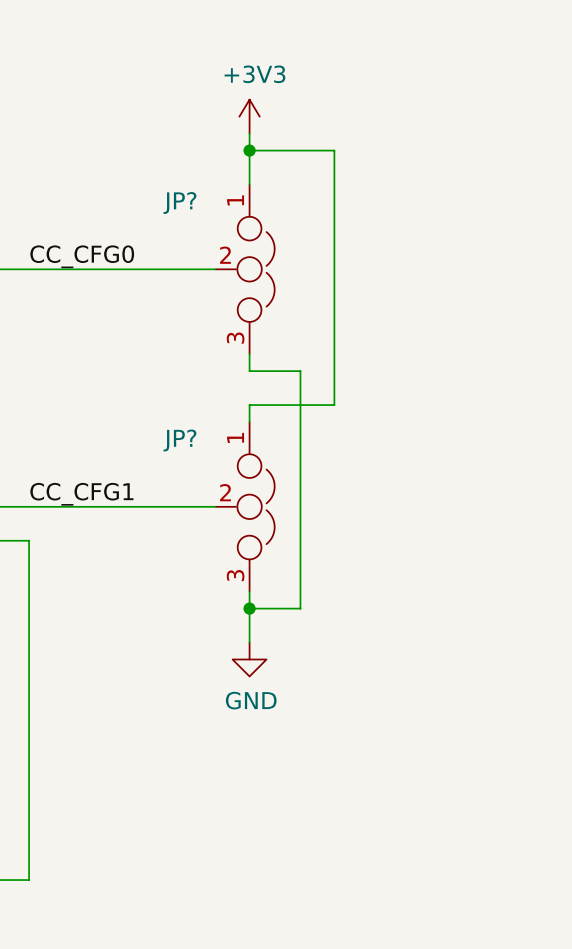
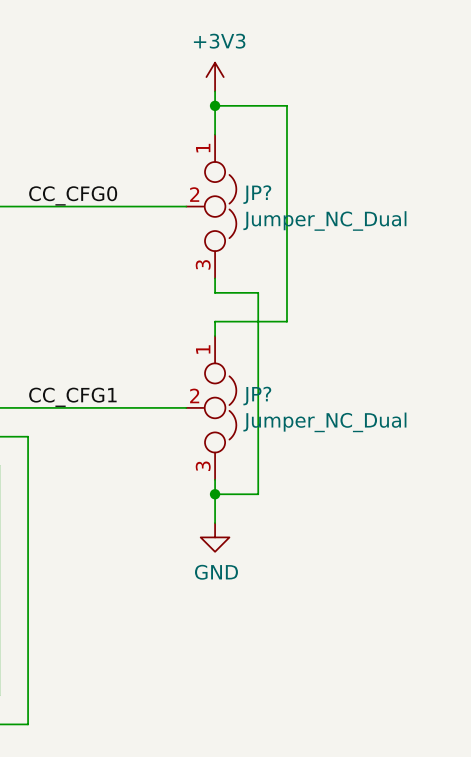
JP? name position: JP? (179, 203) -> JP? (257, 194)
JP? value: none -> Jumper_NC_Dual (324, 220)
JP? name position: JP? (179, 440) -> JP? (257, 396)
JP? value: none -> Jumper_NC_Dual (324, 422)

